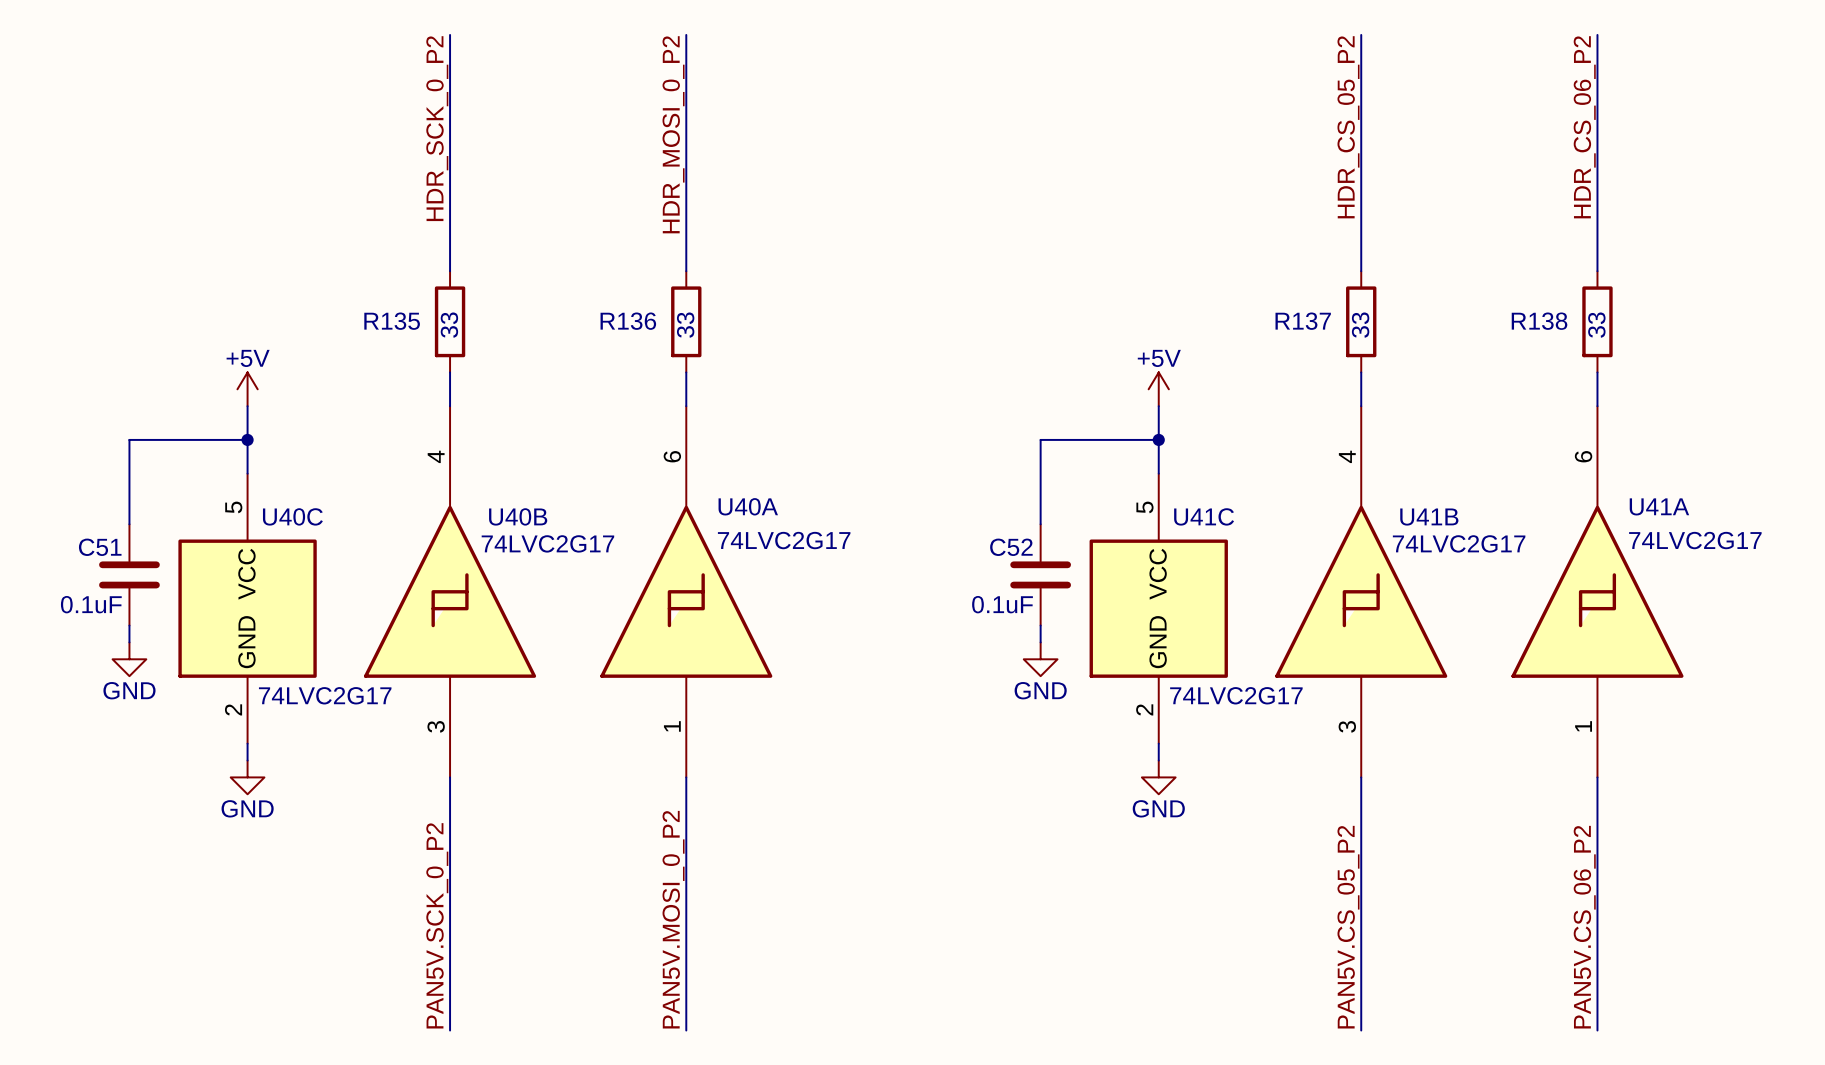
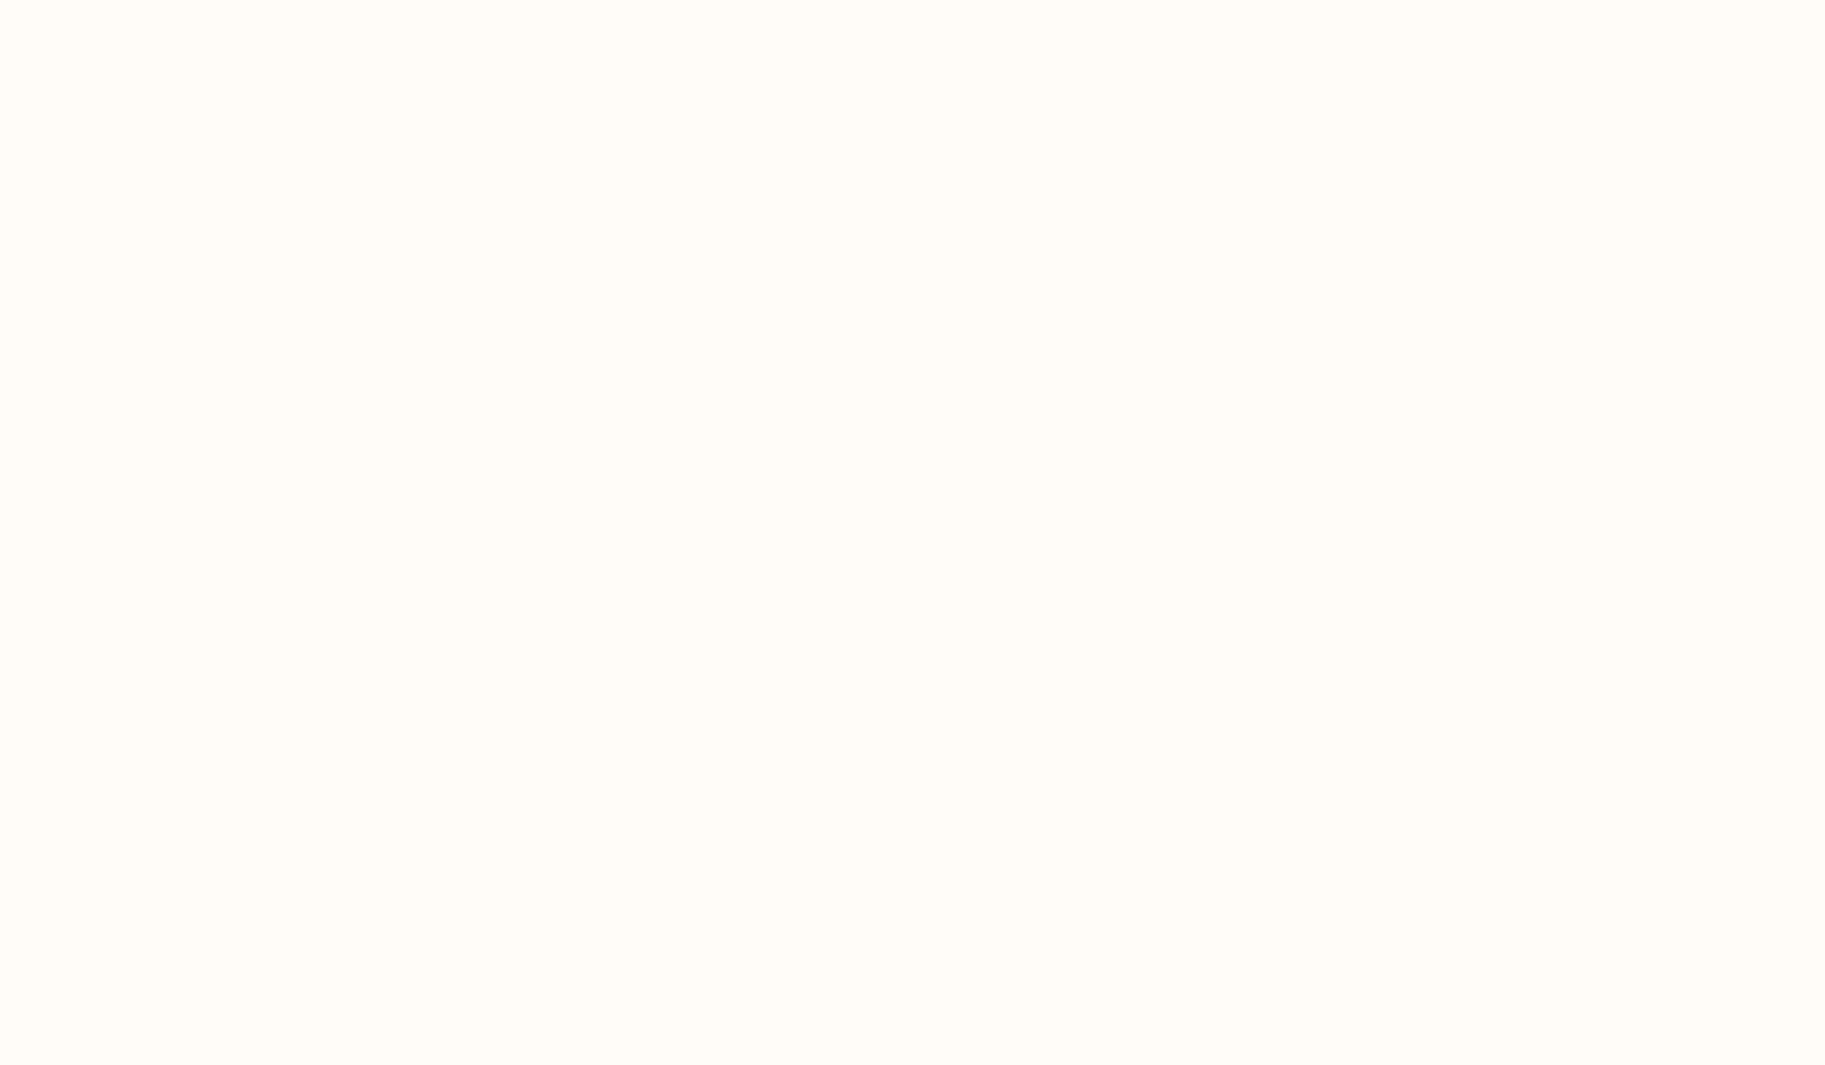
wire: (450, 34) (450, 271) -> none
wire: (686, 34) (686, 271) -> none
wire: (1361, 34) (1361, 271) -> none
wire: (1597, 34) (1597, 271) -> none
label: HDR_CS_05_P2 (1348, 127) -> none
label: HDR_CS_06_P2 (1584, 127) -> none
label: HDR_SCK_0_P2 (437, 128) -> none
label: HDR_MOSI_0_P2 (673, 134) -> none
R135: 33 (450, 321) -> none
R136: 33 (686, 321) -> none
R137: 33 (1361, 321) -> none
R138: 33 (1597, 321) -> none
wire: (450, 372) (450, 406) -> none
wire: (686, 372) (686, 406) -> none
wire: (1361, 372) (1361, 406) -> none
wire: (1597, 372) (1597, 406) -> none
power symbol: +5V (247, 389) -> none
power symbol: +5V (1158, 389) -> none
wire: (247, 406) (247, 473) -> none
wire: (1158, 406) (1158, 473) -> none
wire: (247, 439) (129, 439) (129, 524) -> none
junction: (247, 439) -> none
wire: (1158, 439) (1040, 439) (1040, 524) -> none
junction: (1158, 439) -> none
C51: 0.1uF (129, 574) -> none
C52: 0.1uF (1040, 574) -> none
U40B: 74LVC2G17 (450, 591) -> none
U40A: 74LVC2G17 (686, 591) -> none
U41B: 74LVC2G17 (1361, 591) -> none
U41A: 74LVC2G17 (1597, 591) -> none
U40C: 74LVC2G17 (247, 608) -> none
U41C: 74LVC2G17 (1158, 608) -> none
wire: (129, 625) (129, 642) -> none
wire: (1040, 625) (1040, 642) -> none
power symbol: GND (129, 659) -> none
power symbol: GND (1040, 659) -> none
wire: (247, 743) (247, 760) -> none
wire: (1158, 743) (1158, 760) -> none
power symbol: GND (247, 777) -> none
wire: (450, 777) (450, 1030) -> none
wire: (686, 777) (686, 1030) -> none
power symbol: GND (1158, 777) -> none
wire: (1361, 777) (1361, 1030) -> none
wire: (1597, 777) (1597, 1030) -> none
label: PAN5V.MOSI_0_P2 (673, 919) -> none
label: PAN5V.SCK_0_P2 (437, 925) -> none
label: PAN5V.CS_05_P2 (1348, 927) -> none
label: PAN5V.CS_06_P2 (1584, 927) -> none

